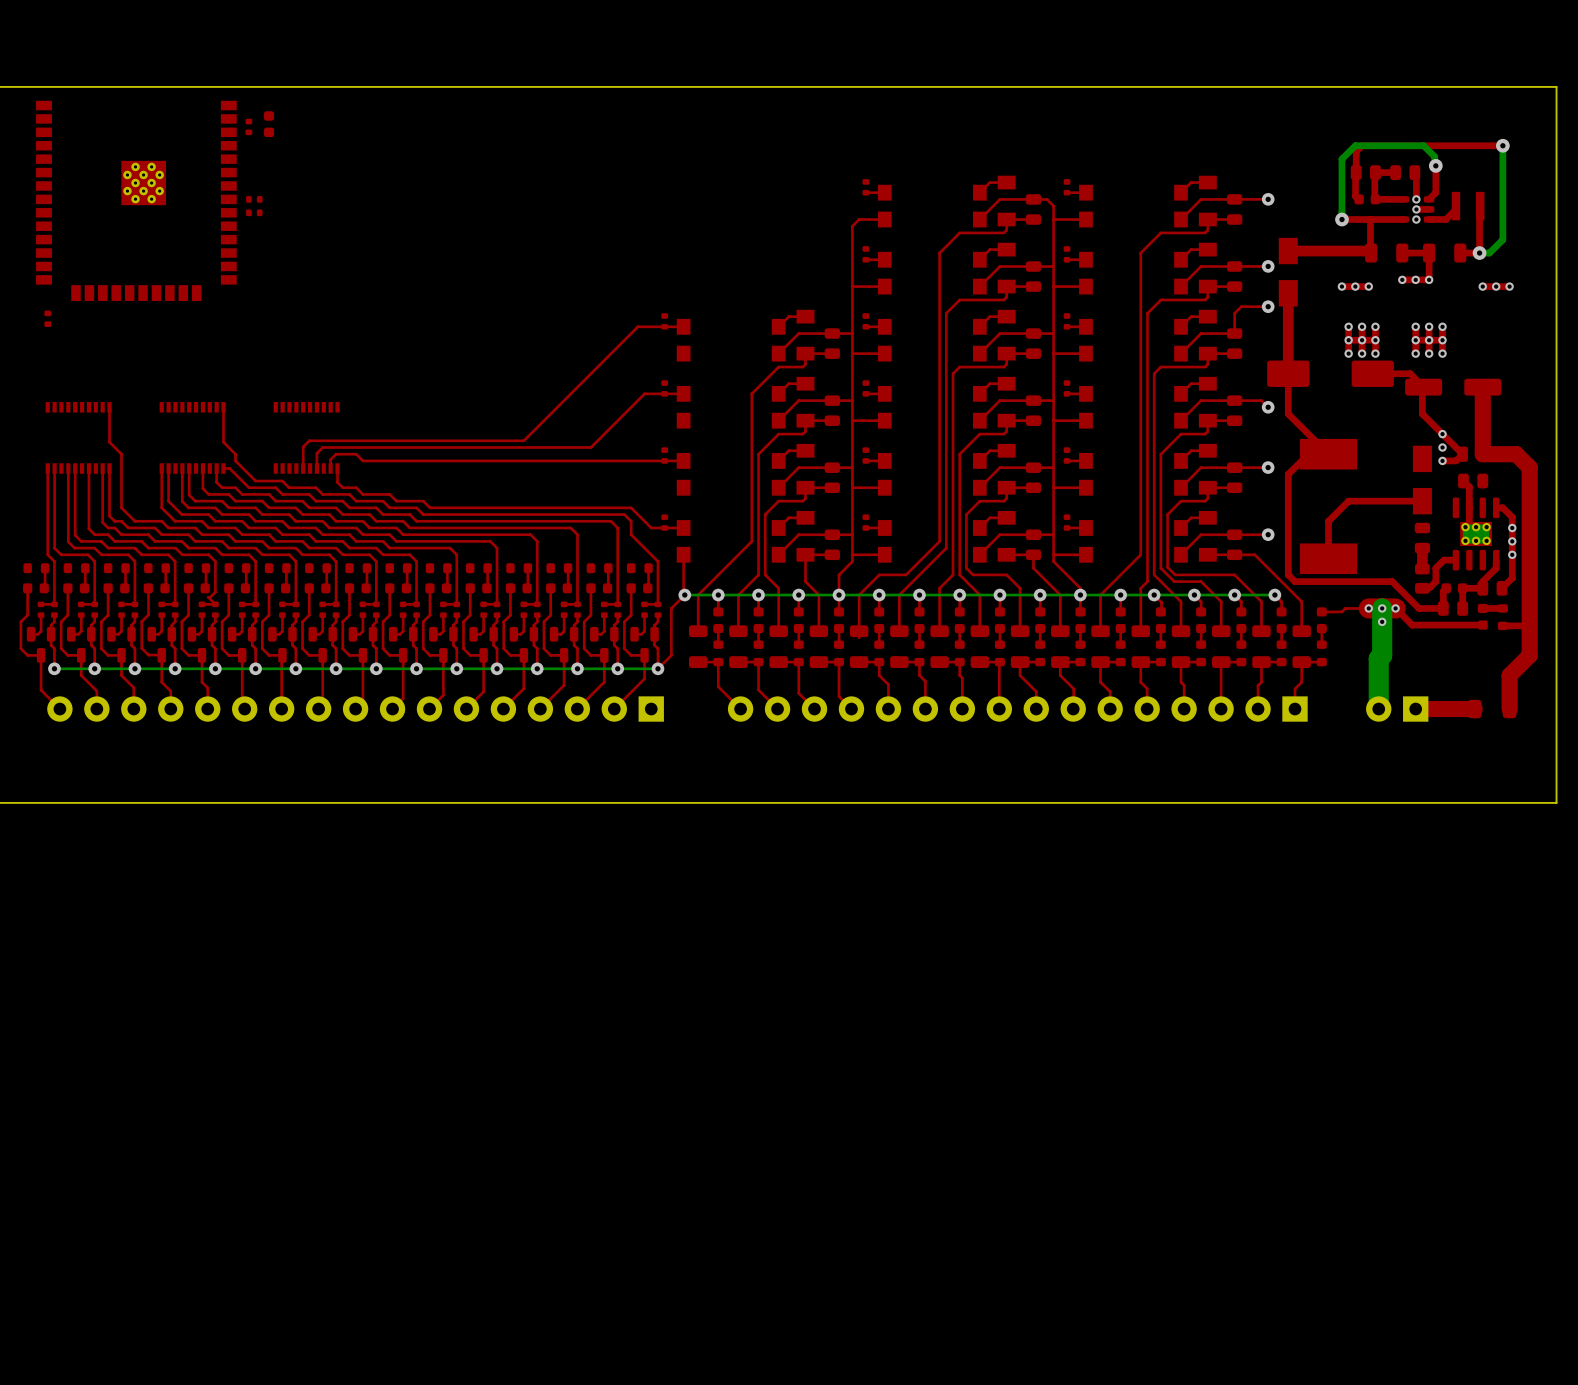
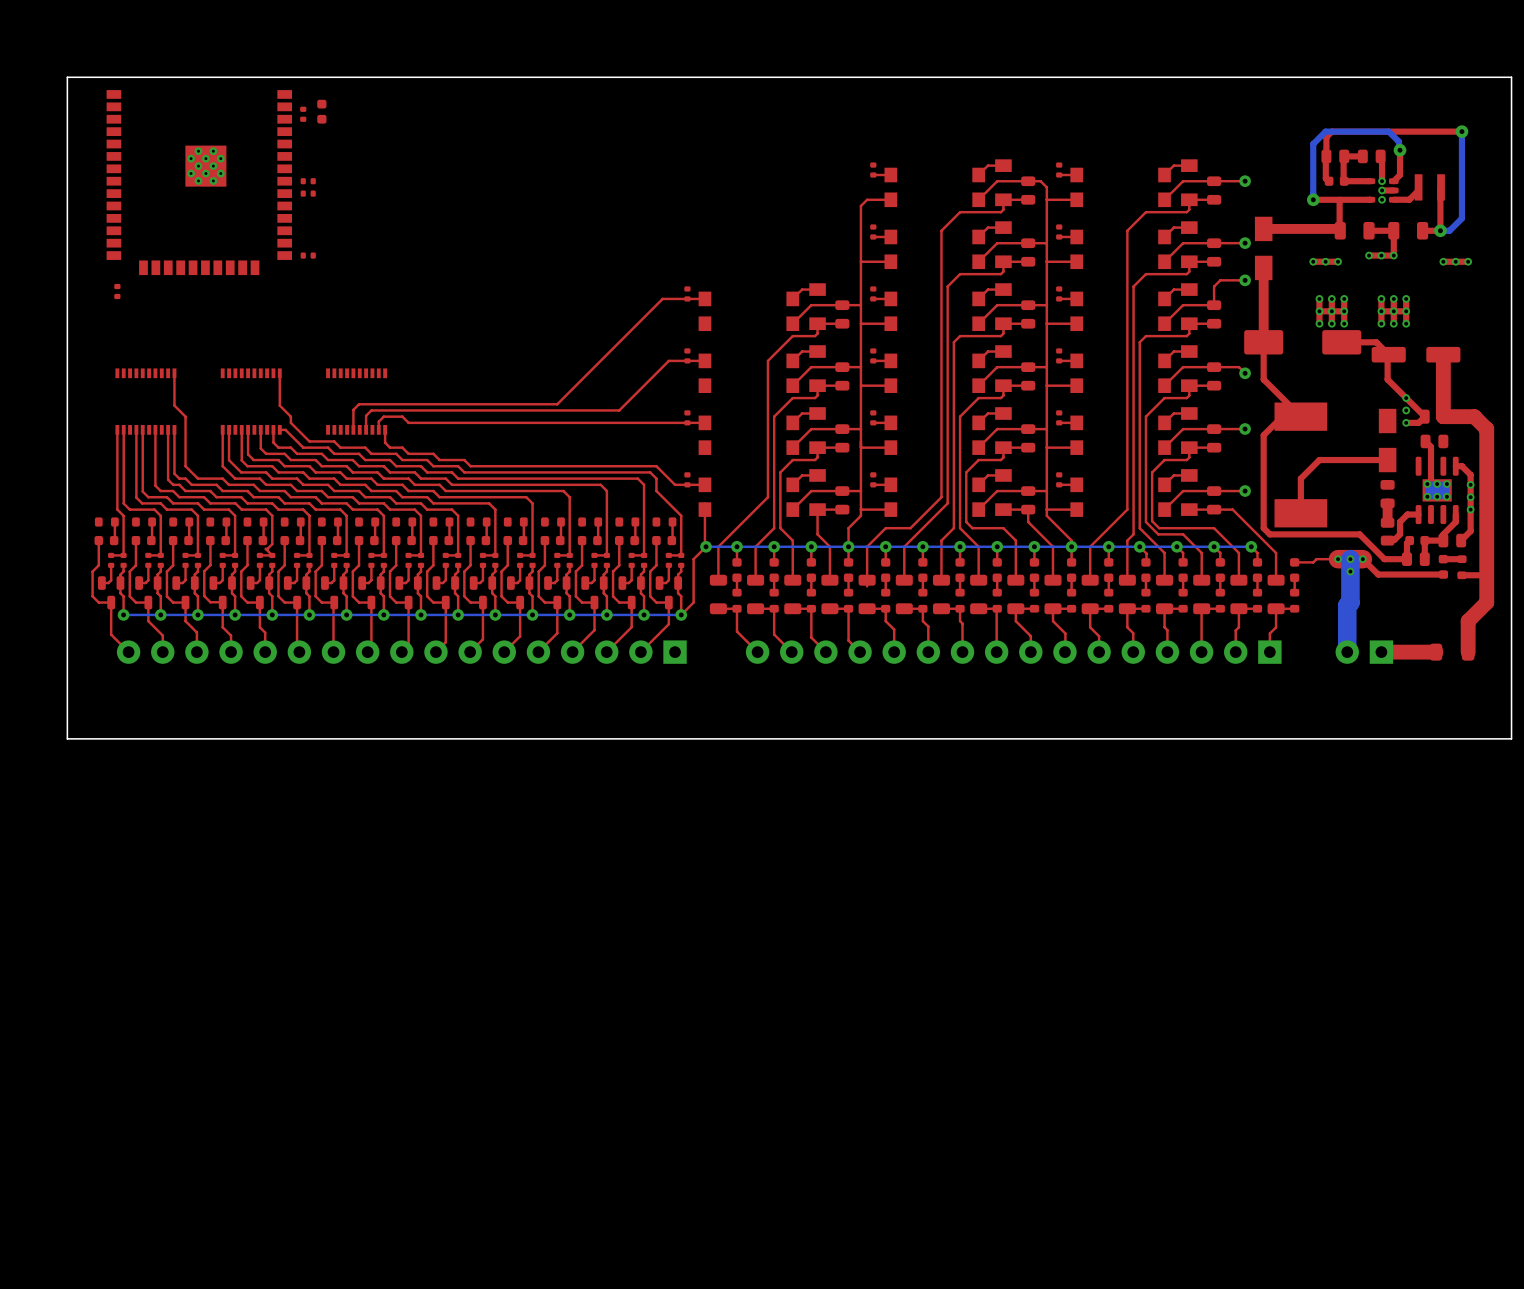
part: none -> (308, 255)

